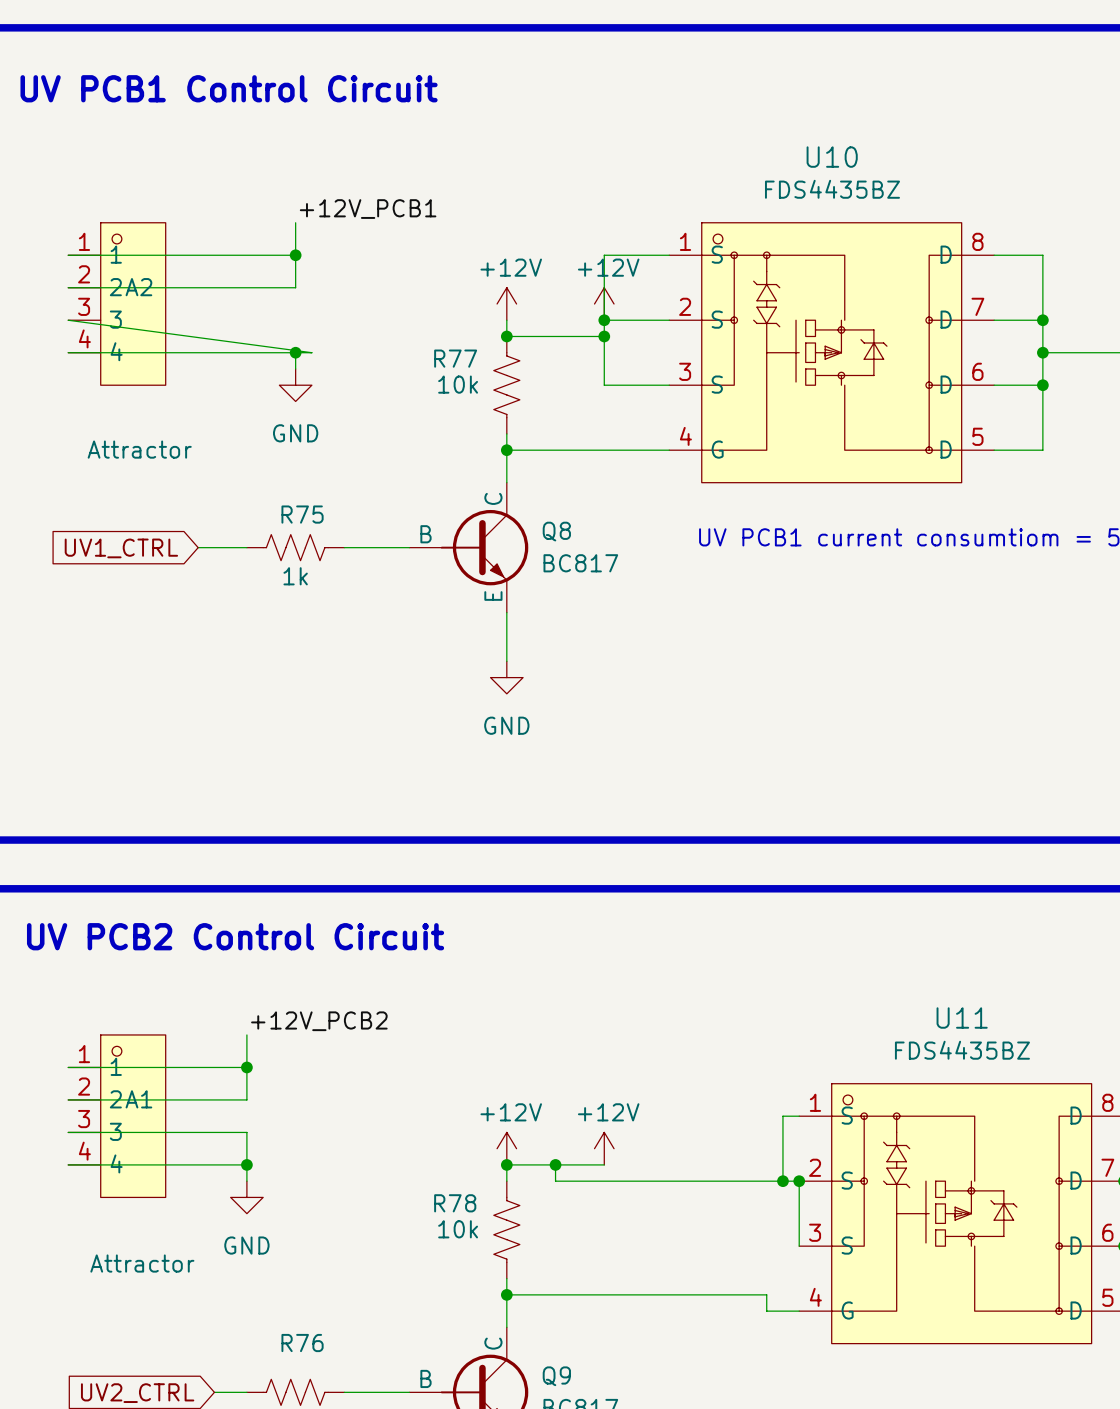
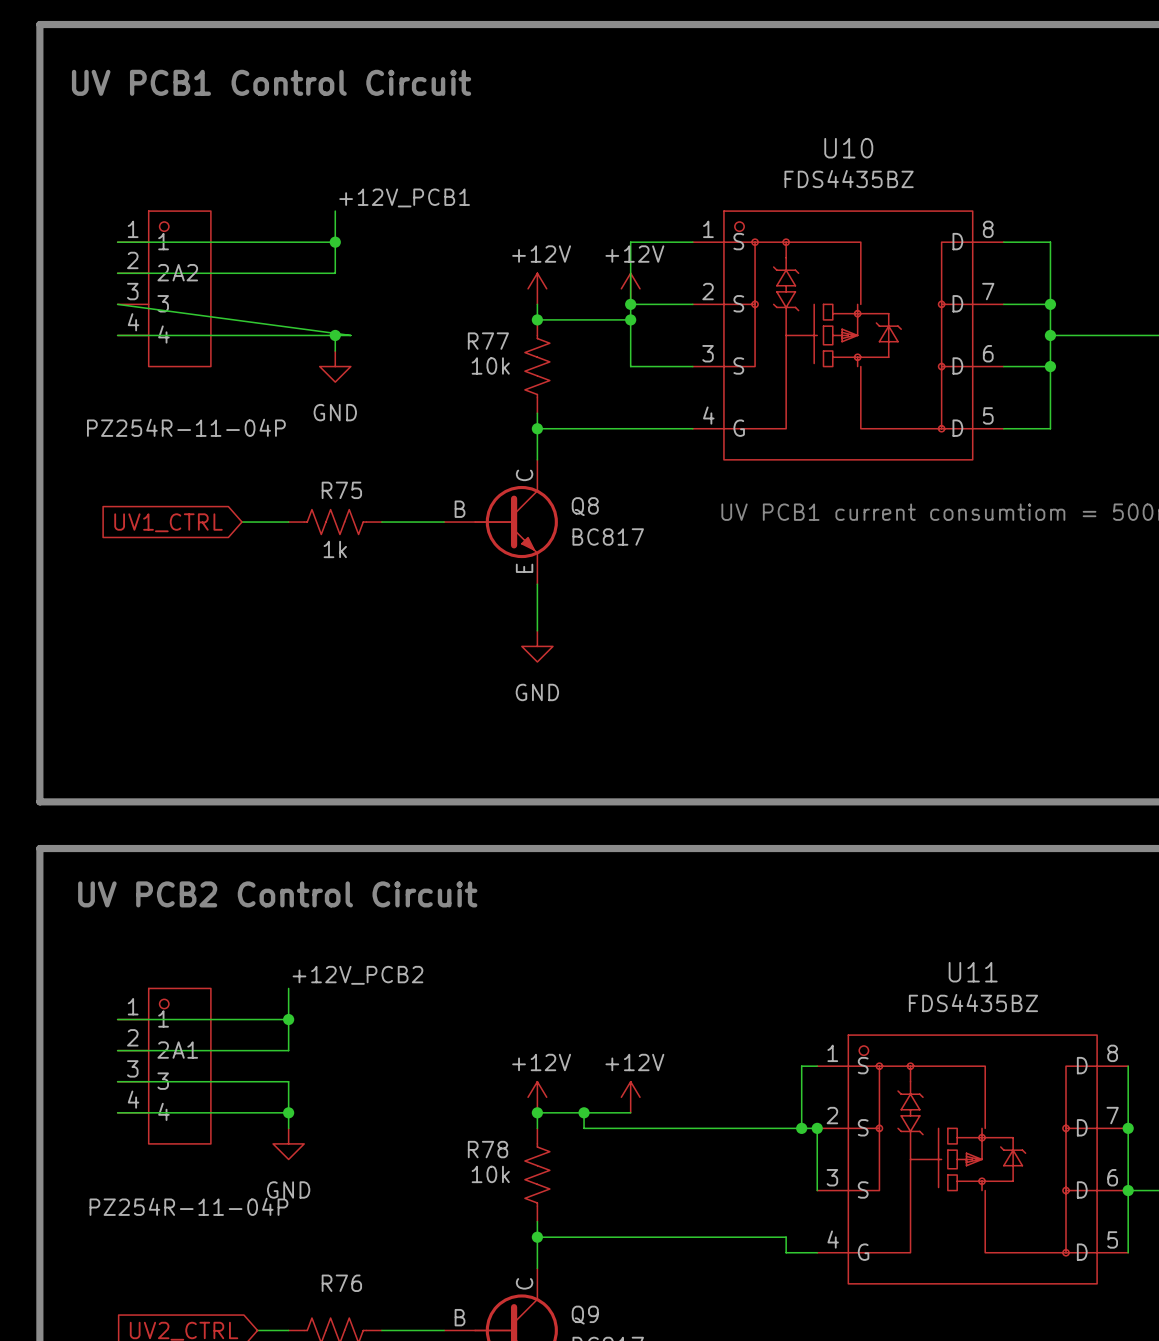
A2 value: Attractor (139, 449) -> PZ254R-11-04P (186, 427)
A1 value: Attractor (142, 1263) -> PZ254R-11-04P (188, 1206)

